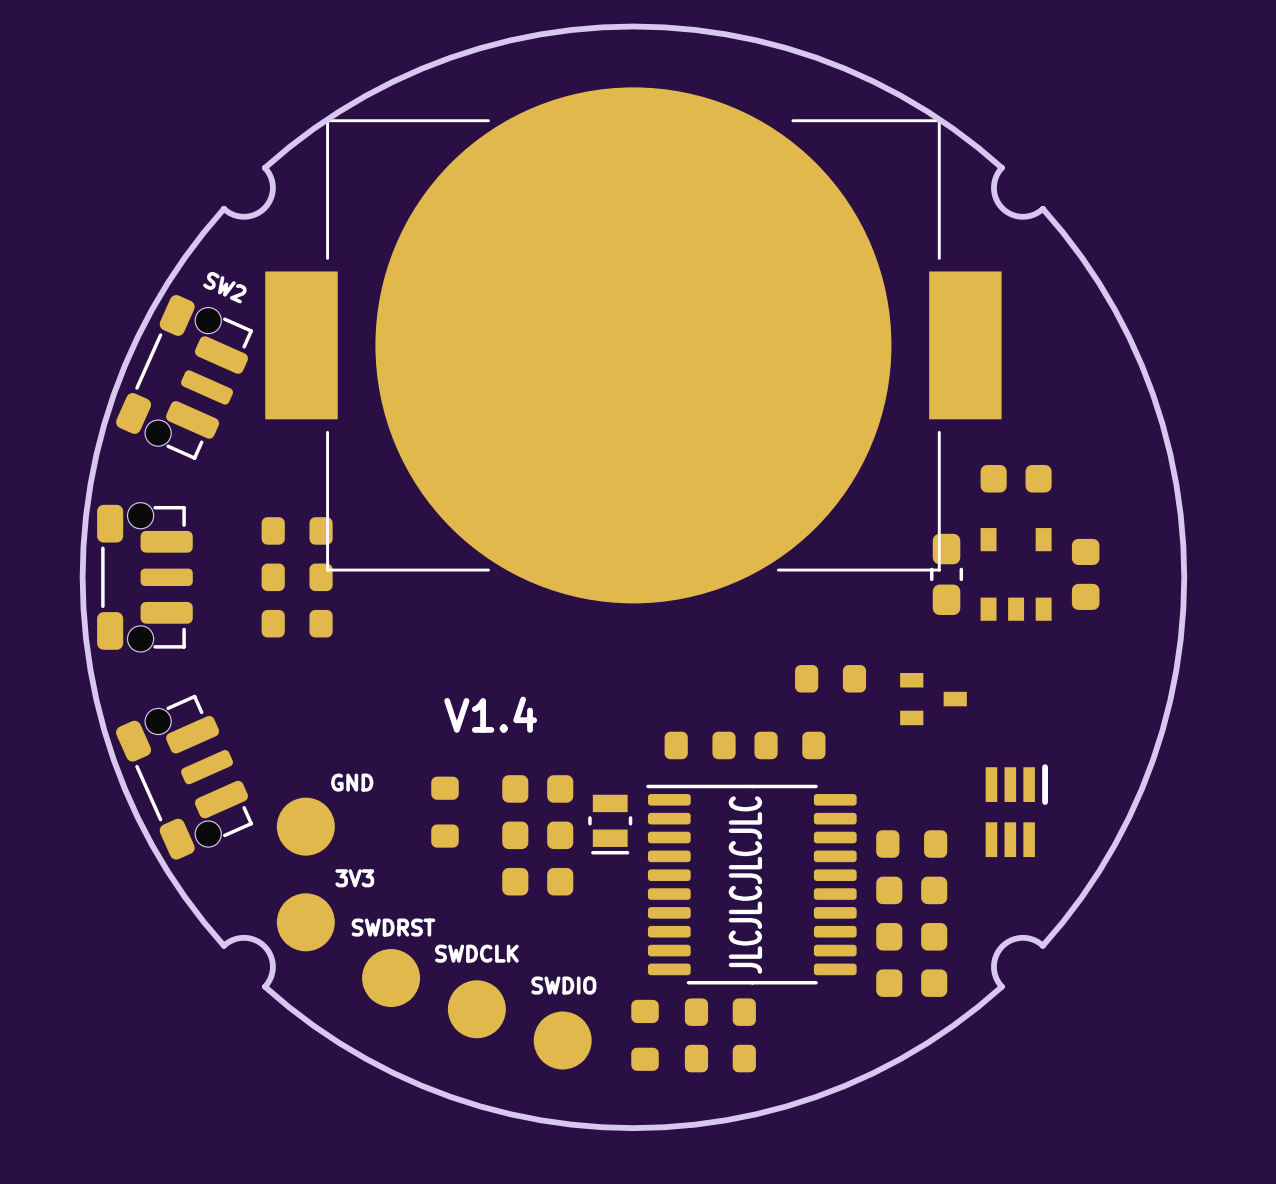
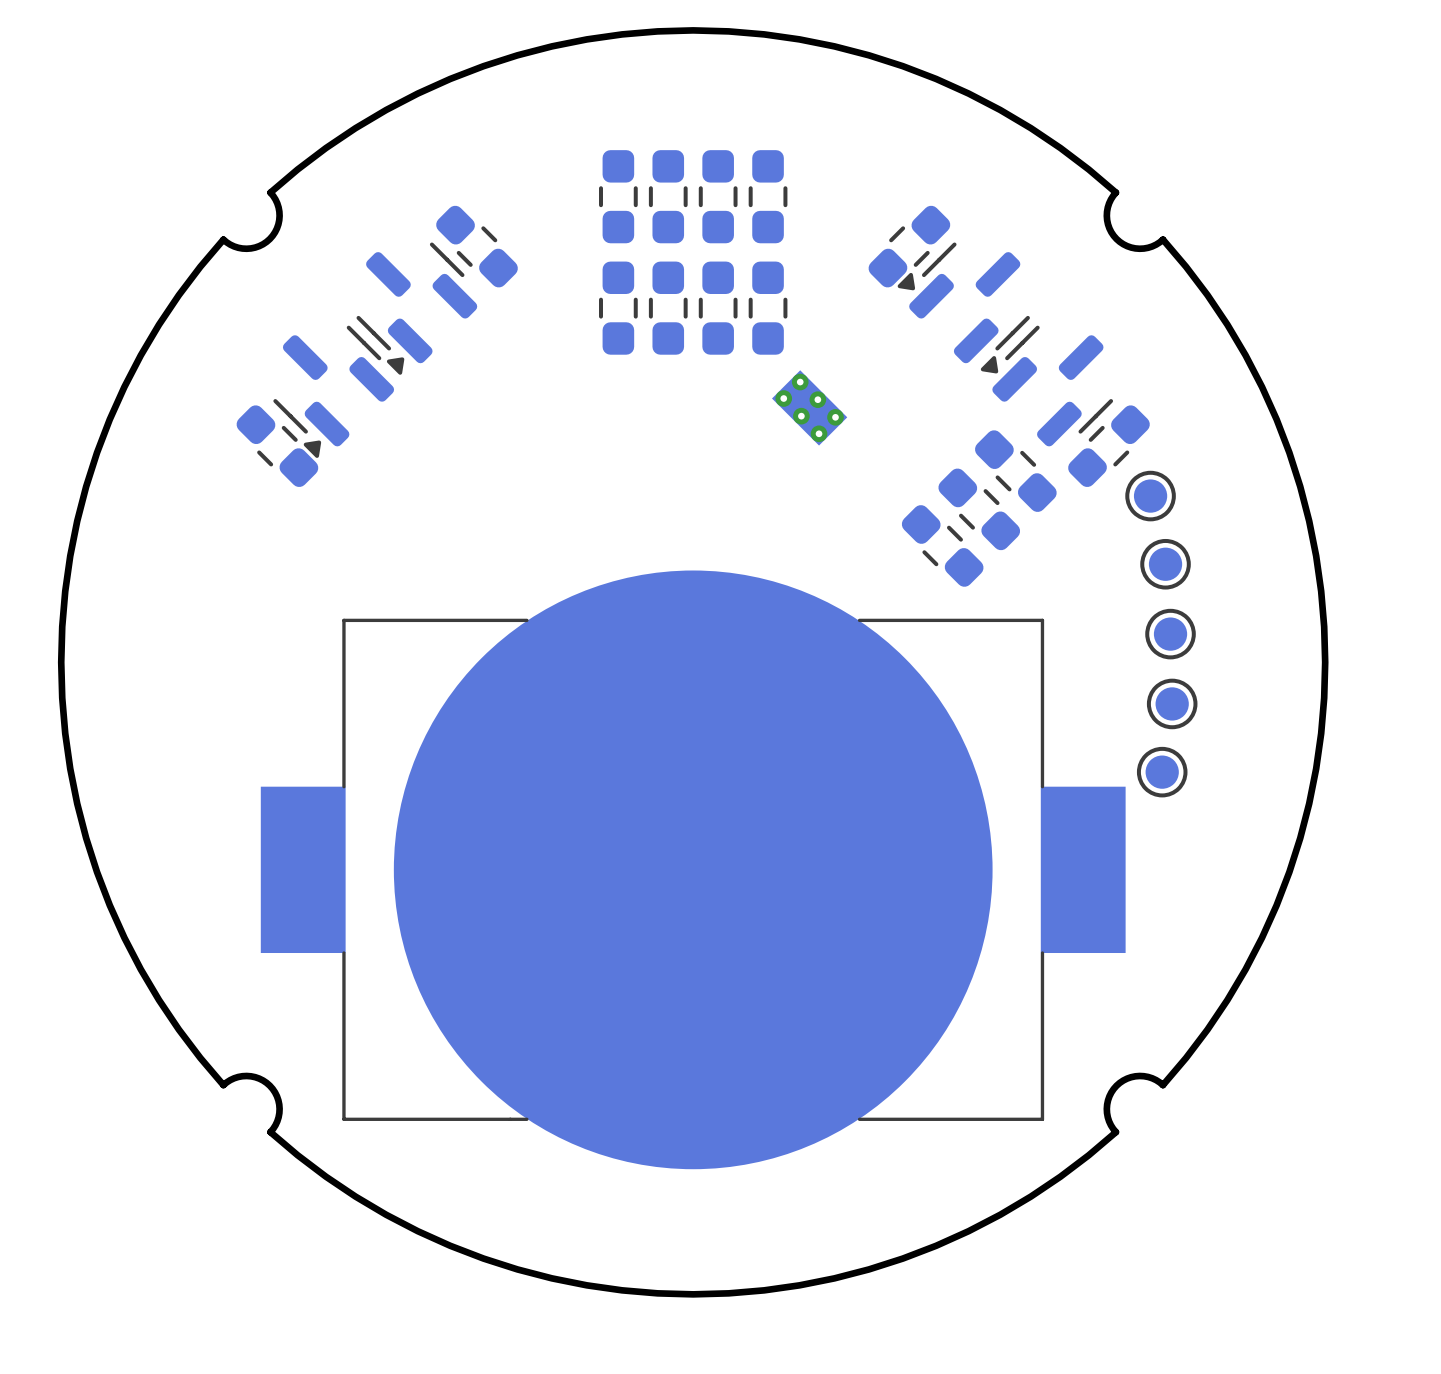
part: none -> (618, 196)
part: none -> (668, 196)
part: none -> (718, 196)
part: none -> (768, 196)
part: none -> (477, 246)
part: none -> (909, 246)
part: none -> (963, 302)
part: none -> (618, 308)
part: none -> (668, 308)
part: none -> (718, 308)
part: none -> (768, 308)
part: none -> (416, 308)
part: none -> (1046, 386)
part: none -> (333, 391)
part: (633, 345) -> none
part: none -> (809, 407)
SW2: (184, 377) -> none
part: none -> (277, 446)
part: none -> (1108, 446)
part: none -> (1015, 471)
part: none -> (1150, 496)
part: none -> (979, 509)
part: none -> (942, 545)
part: (1016, 478) -> none
part: none -> (1165, 564)
part: (297, 530) -> none
part: none -> (1170, 634)
part: (946, 574) -> none
part: (1016, 574) -> none
part: (1085, 574) -> none
part: (144, 577) -> none
part: (297, 577) -> none
part: none -> (1172, 703)
part: (297, 623) -> none
part: none -> (1162, 772)
part: (830, 678) -> none
part: (933, 699) -> none
text: V1.4 (490, 714) -> none
part: (700, 745) -> none
part: (789, 745) -> none
part: none -> (693, 869)
part: (184, 777) -> none
text: GND (352, 782) -> none
part: (537, 788) -> none
part: (1016, 810) -> none
part: (444, 812) -> none
part: (610, 824) -> none
part: (305, 826) -> none
part: (537, 835) -> none
part: (911, 844) -> none
text: 3V3 (354, 878) -> none
part: (537, 881) -> none
part: (751, 884) -> none
text: JLCJLCJLCJLC (745, 885) -> none
part: (911, 890) -> none
part: (305, 922) -> none
text: SWDRST (393, 927) -> none
part: (911, 936) -> none
text: SWDCLK (476, 953) -> none
part: (391, 978) -> none
part: (911, 983) -> none
text: SWDIO (563, 985) -> none
part: (476, 1009) -> none
part: (720, 1012) -> none
part: (645, 1035) -> none
part: (562, 1040) -> none
part: (720, 1058) -> none

